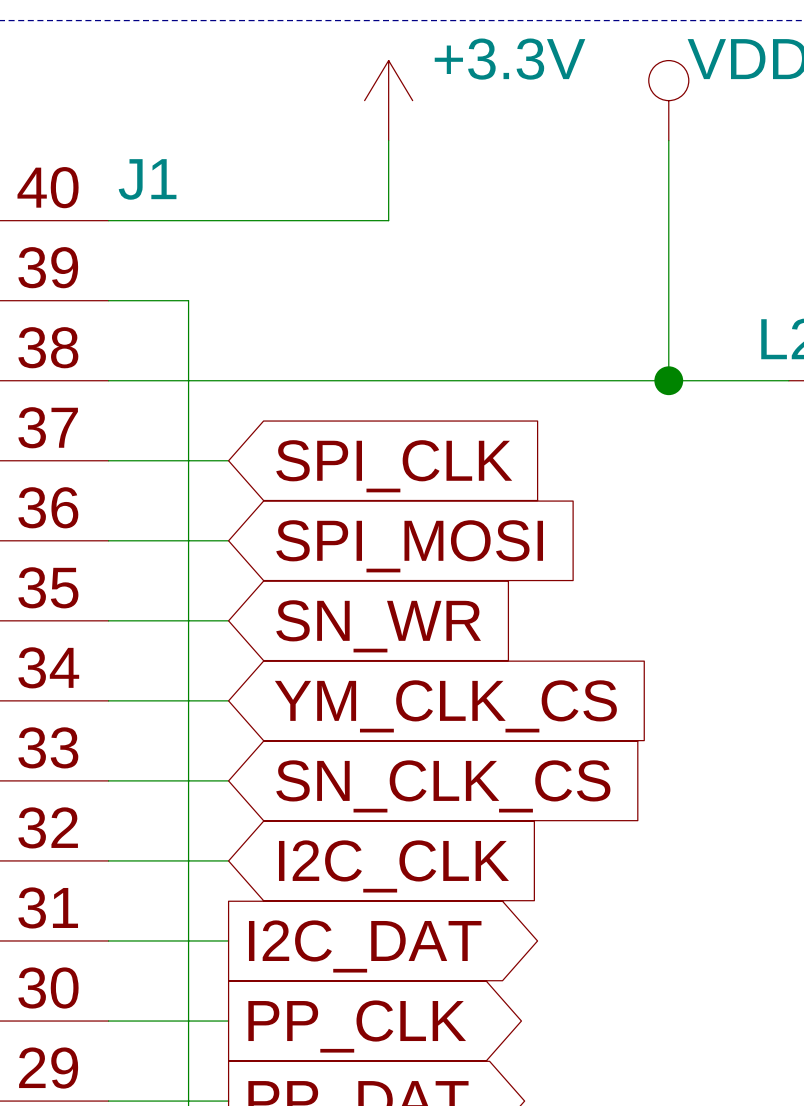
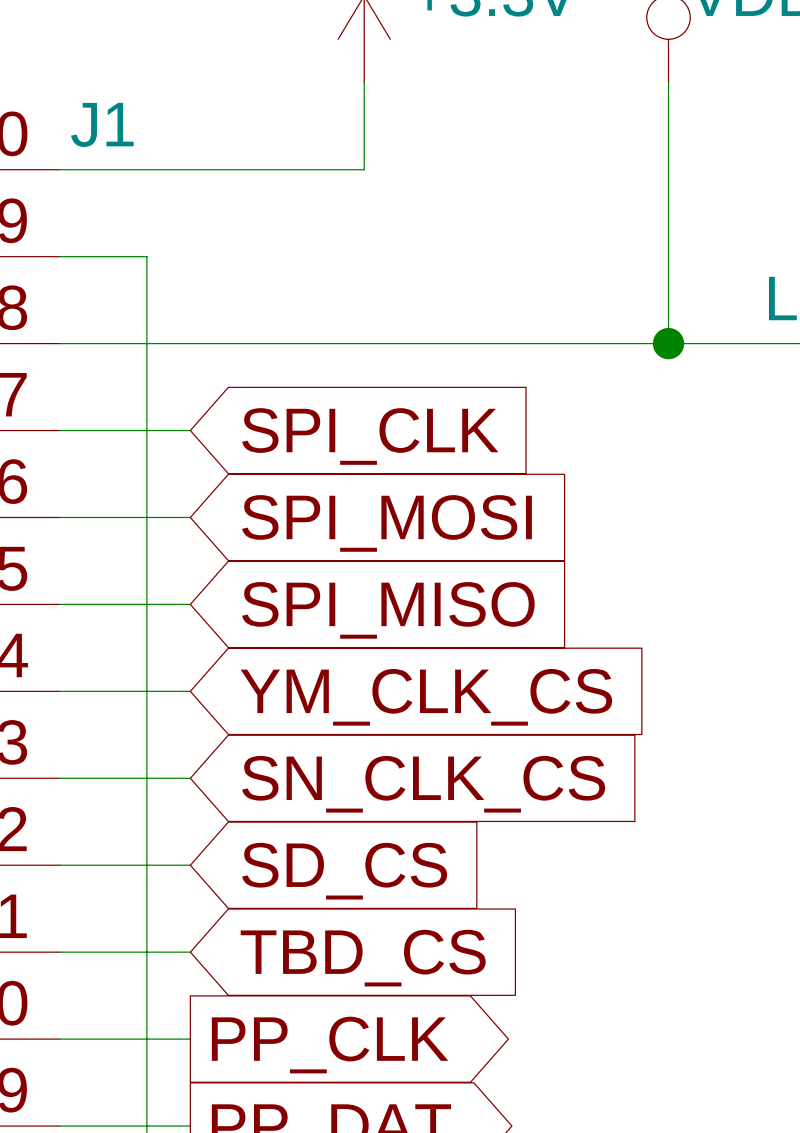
global label: SN_WR (378, 626) -> SPI_MISO (388, 610)
global label: I2C_CLK (393, 866) -> SD_CS (344, 871)
global label shape: output (365, 946) -> input (363, 958)
global label: I2C_DAT (365, 946) -> TBD_CS (363, 958)

